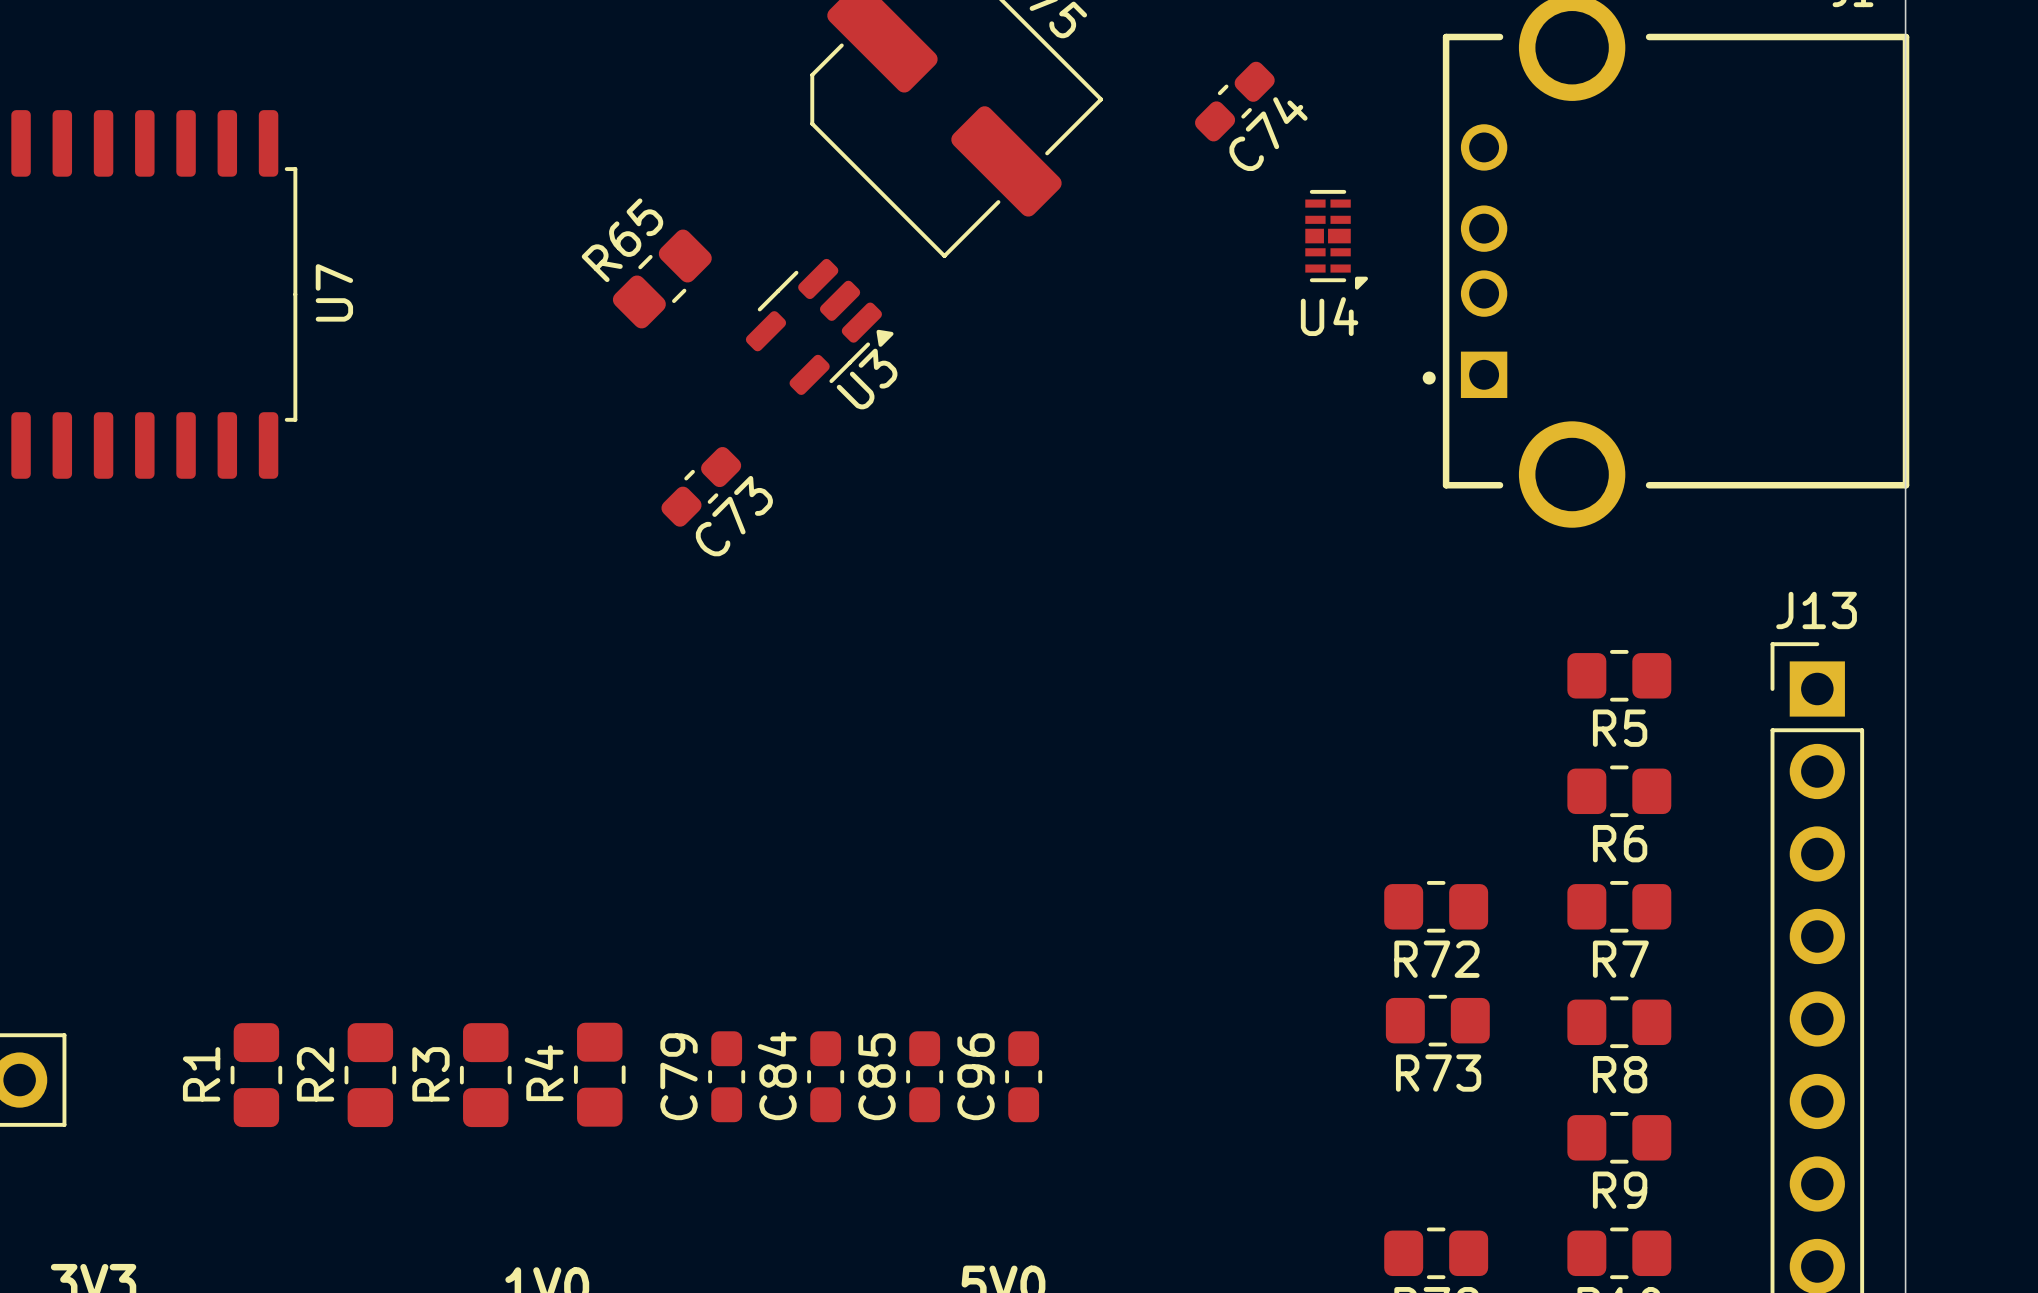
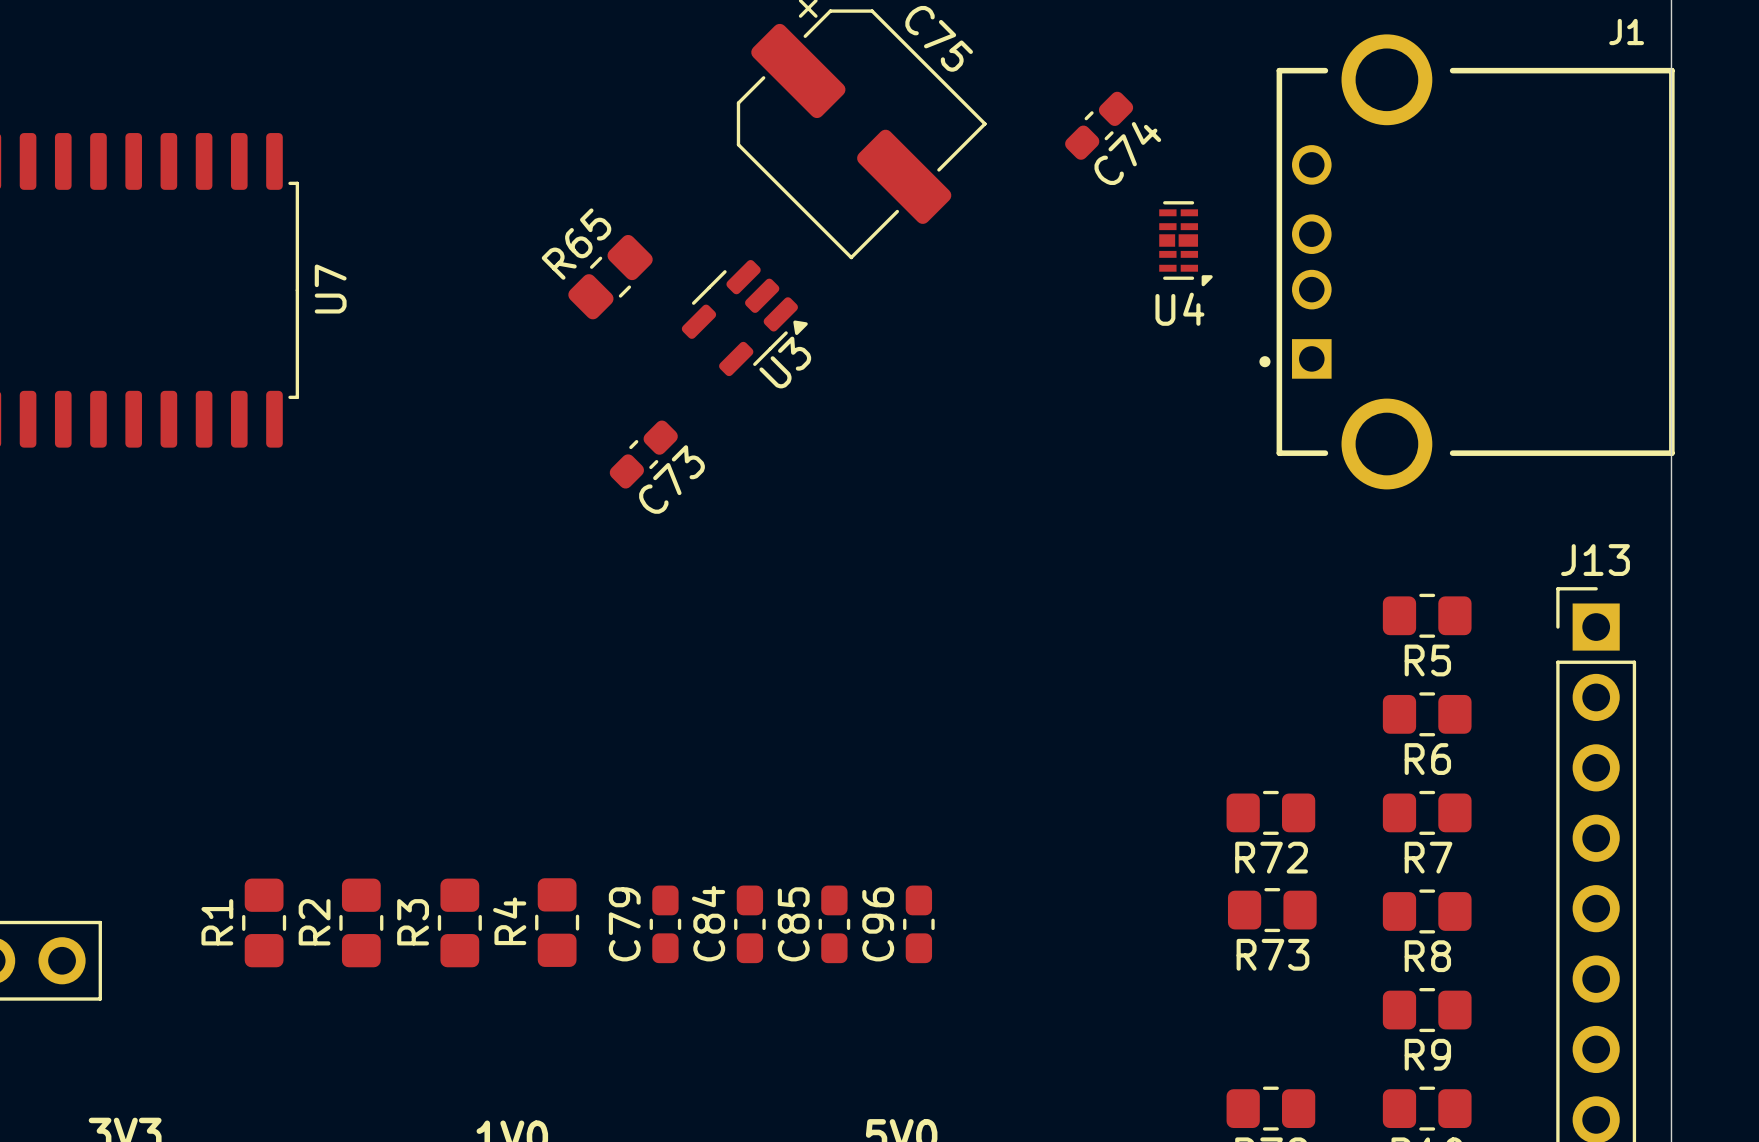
R4 position: (599, 1074) -> (557, 922)
R1 position: (256, 1075) -> (264, 922)
R2 position: (370, 1075) -> (361, 922)
R3 position: (485, 1075) -> (459, 922)
C79 position: (726, 1076) -> (665, 924)
C84 position: (825, 1076) -> (749, 924)
C85 position: (924, 1076) -> (834, 924)
C96 position: (1023, 1076) -> (918, 924)

